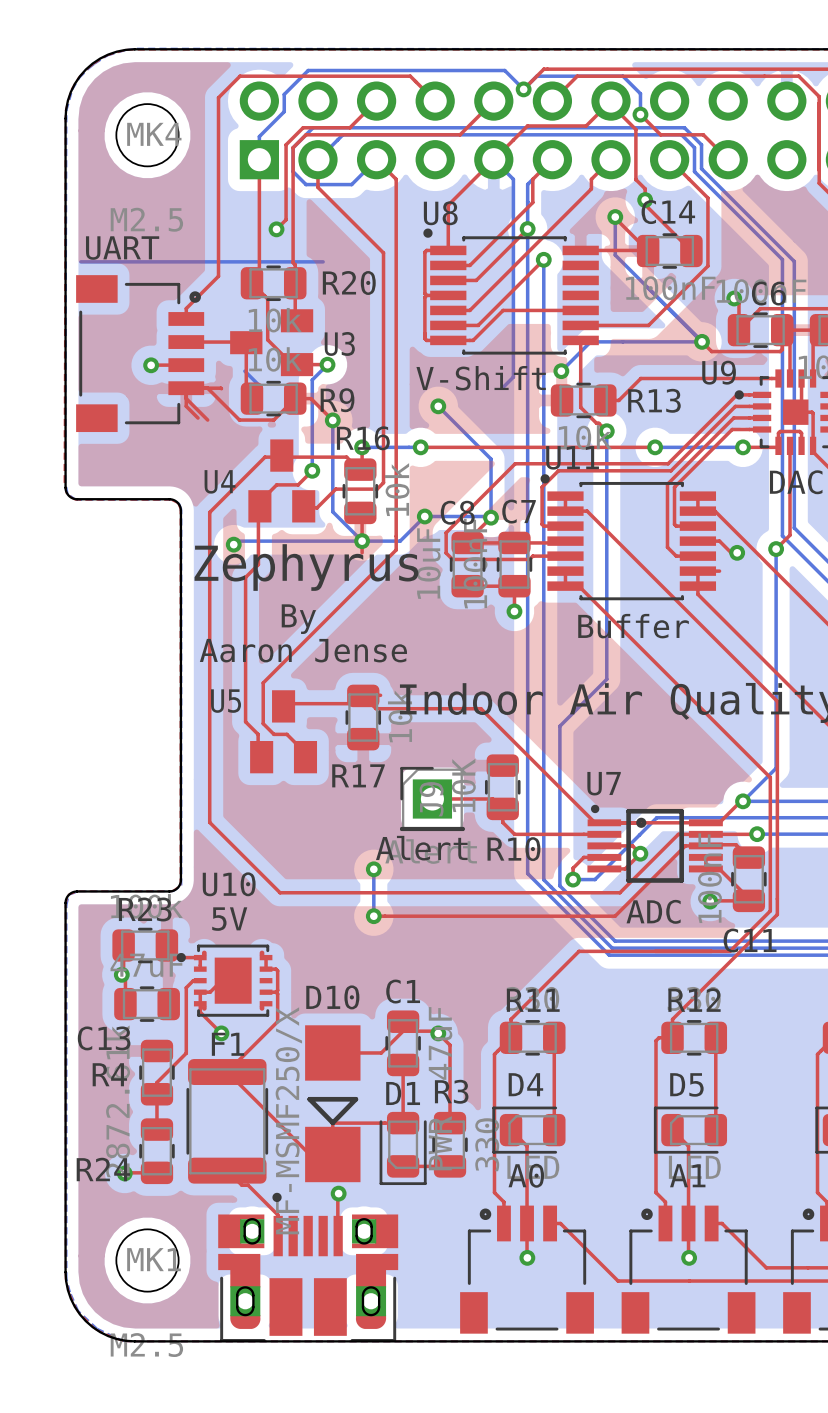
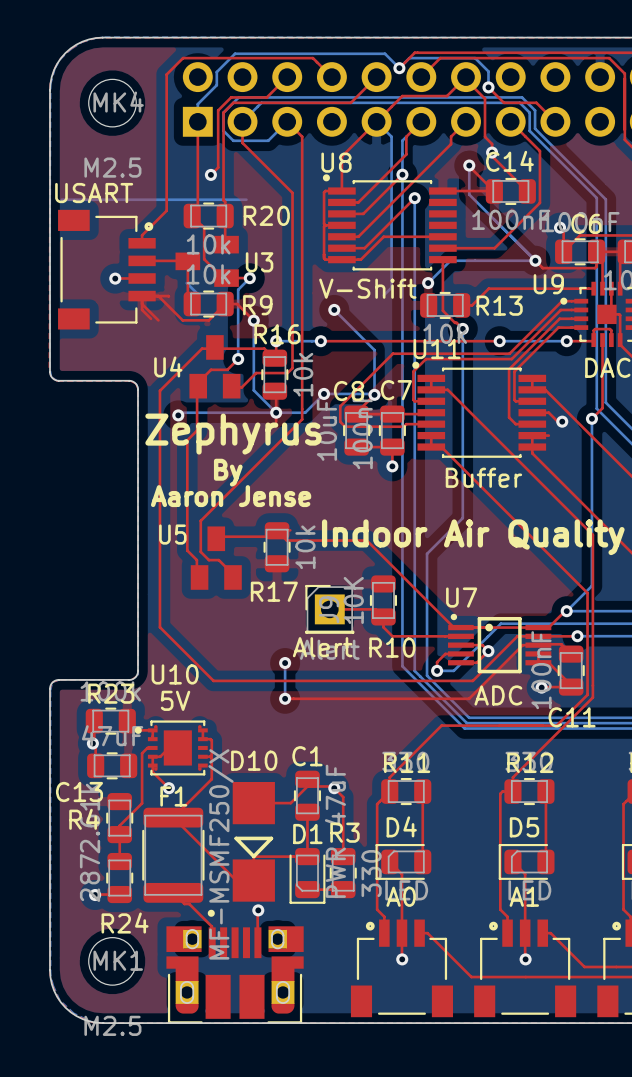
part value: UART (122, 248) -> USART (94, 193)
R24 name position: R24 (103, 1169) -> R24 (125, 923)

